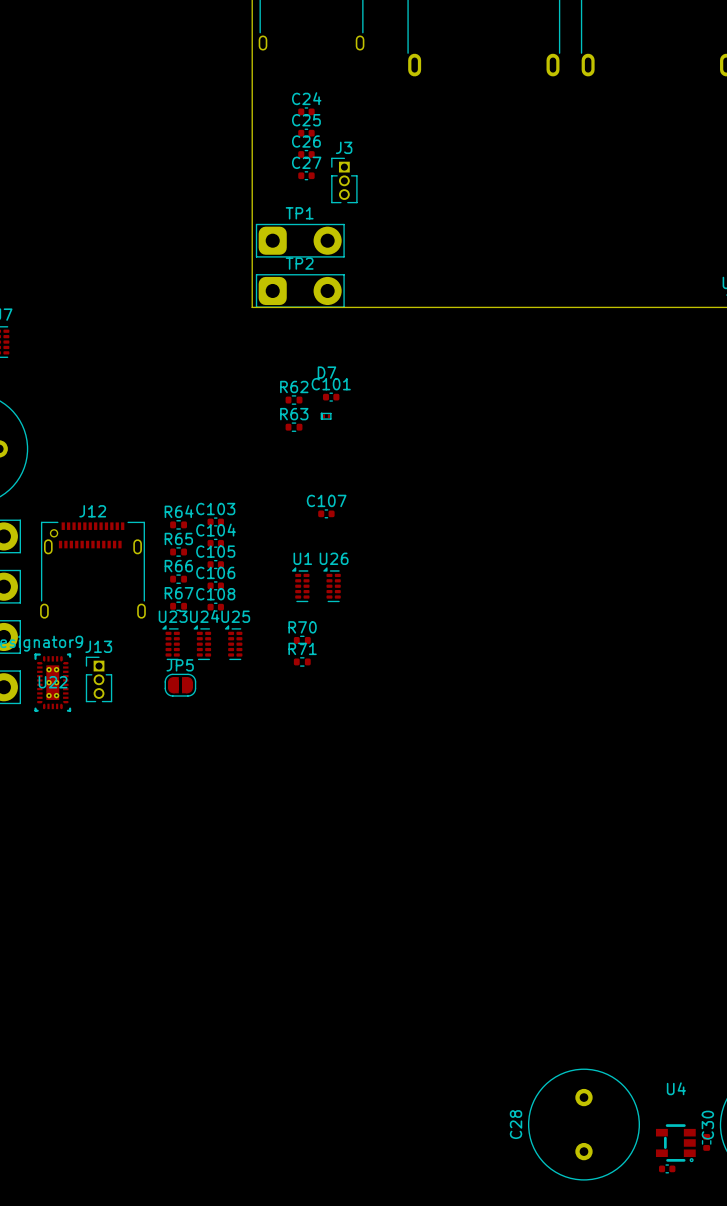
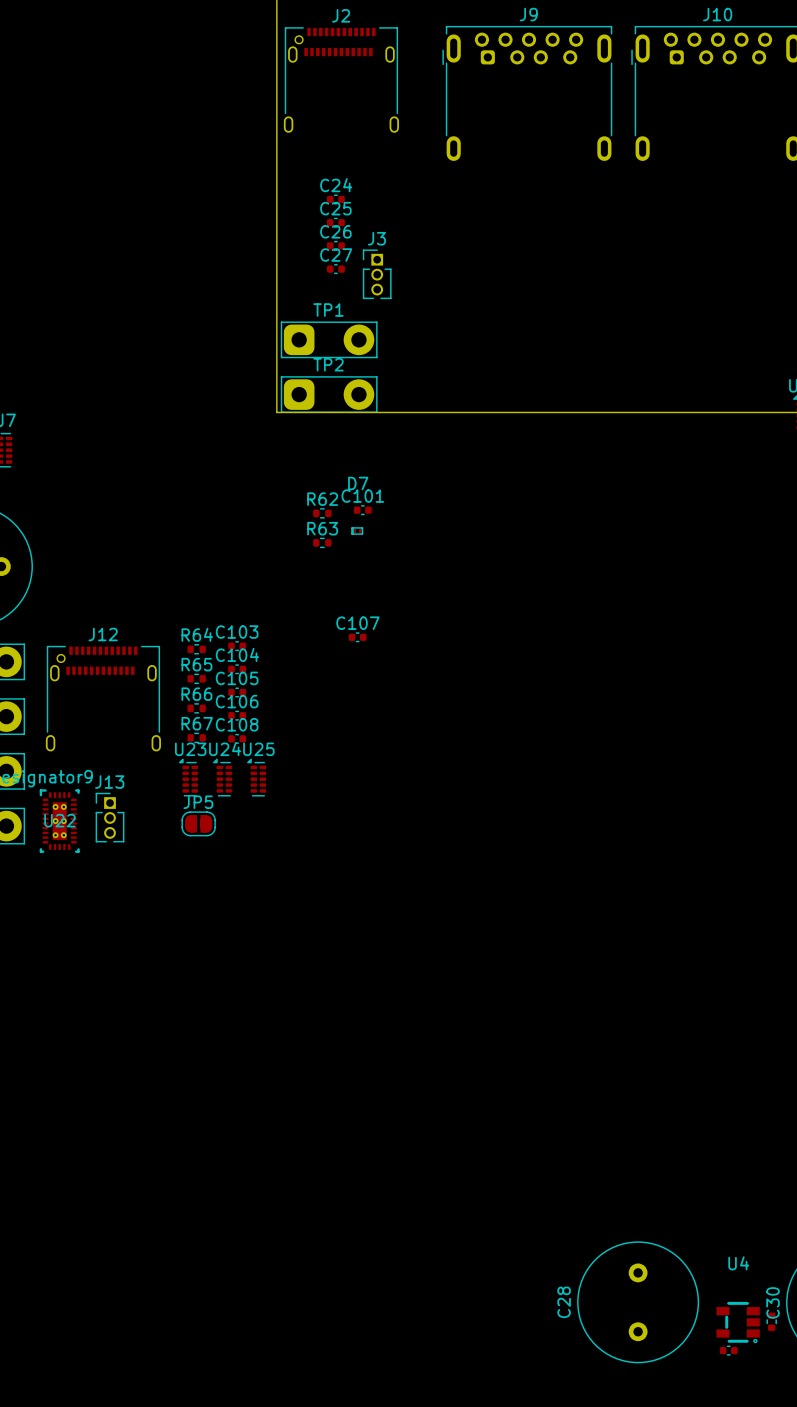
U1: (300, 584) -> none
U26: (332, 584) -> none
R70: (302, 640) -> none
R71: (302, 661) -> none

